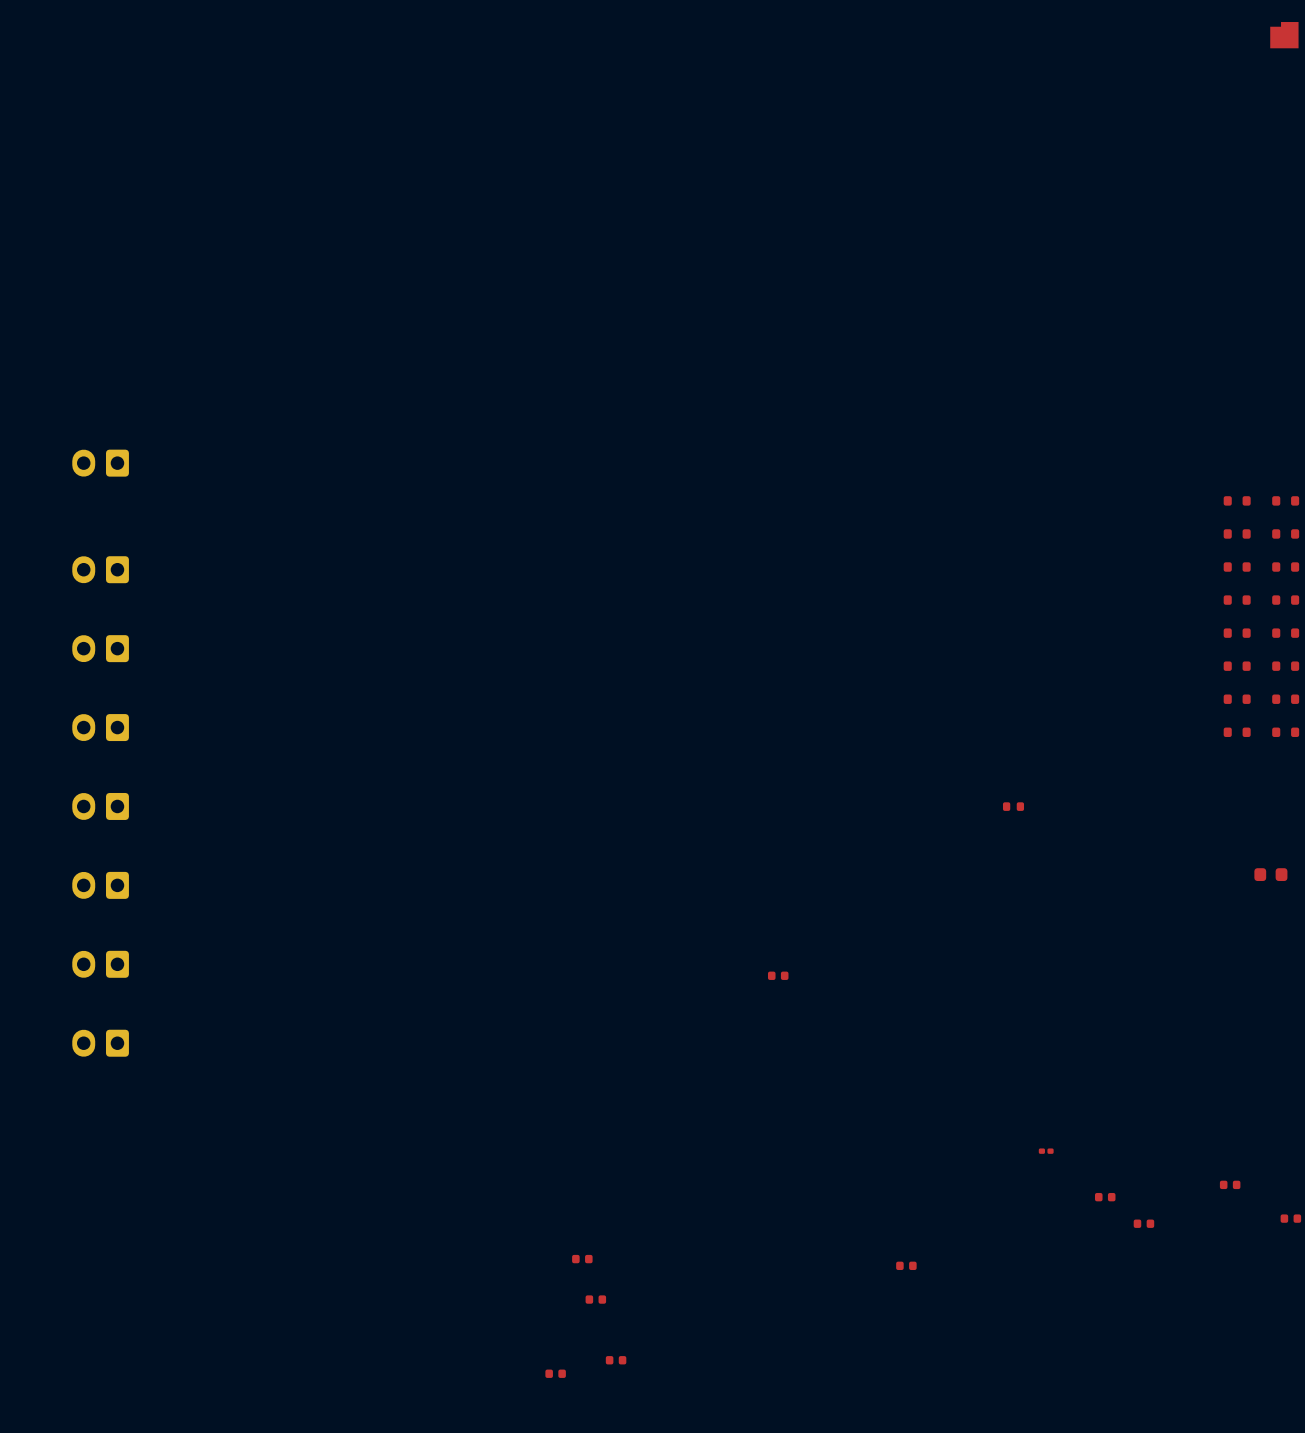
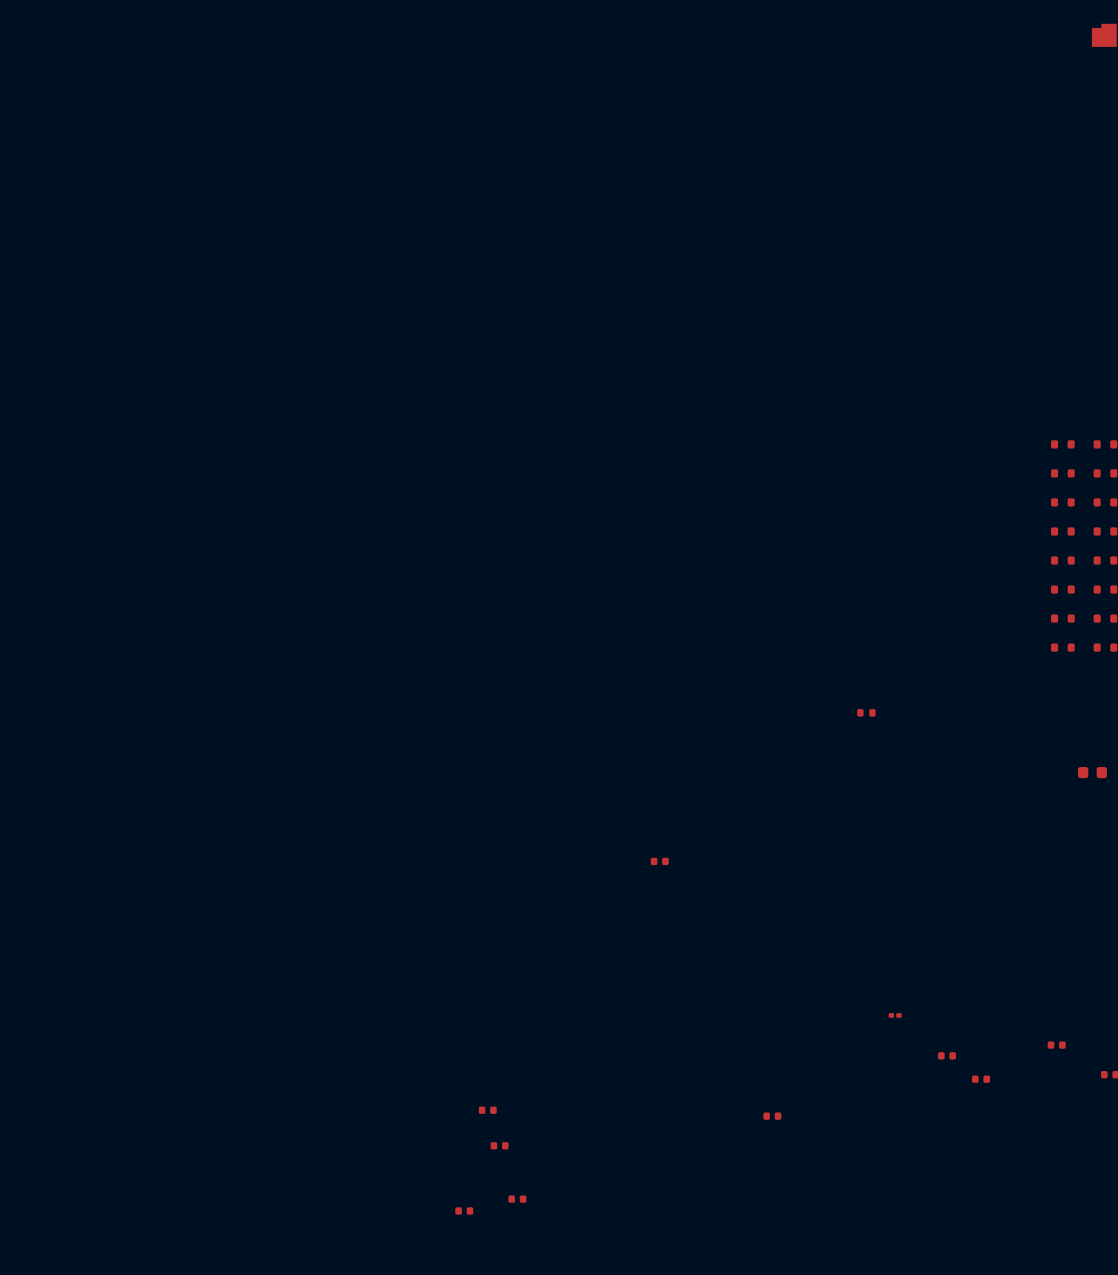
part: (100, 463) -> none
part: (100, 569) -> none
part: (100, 648) -> none
part: (100, 727) -> none
part: (100, 806) -> none
part: (100, 885) -> none
part: (100, 964) -> none
part: (100, 1043) -> none

